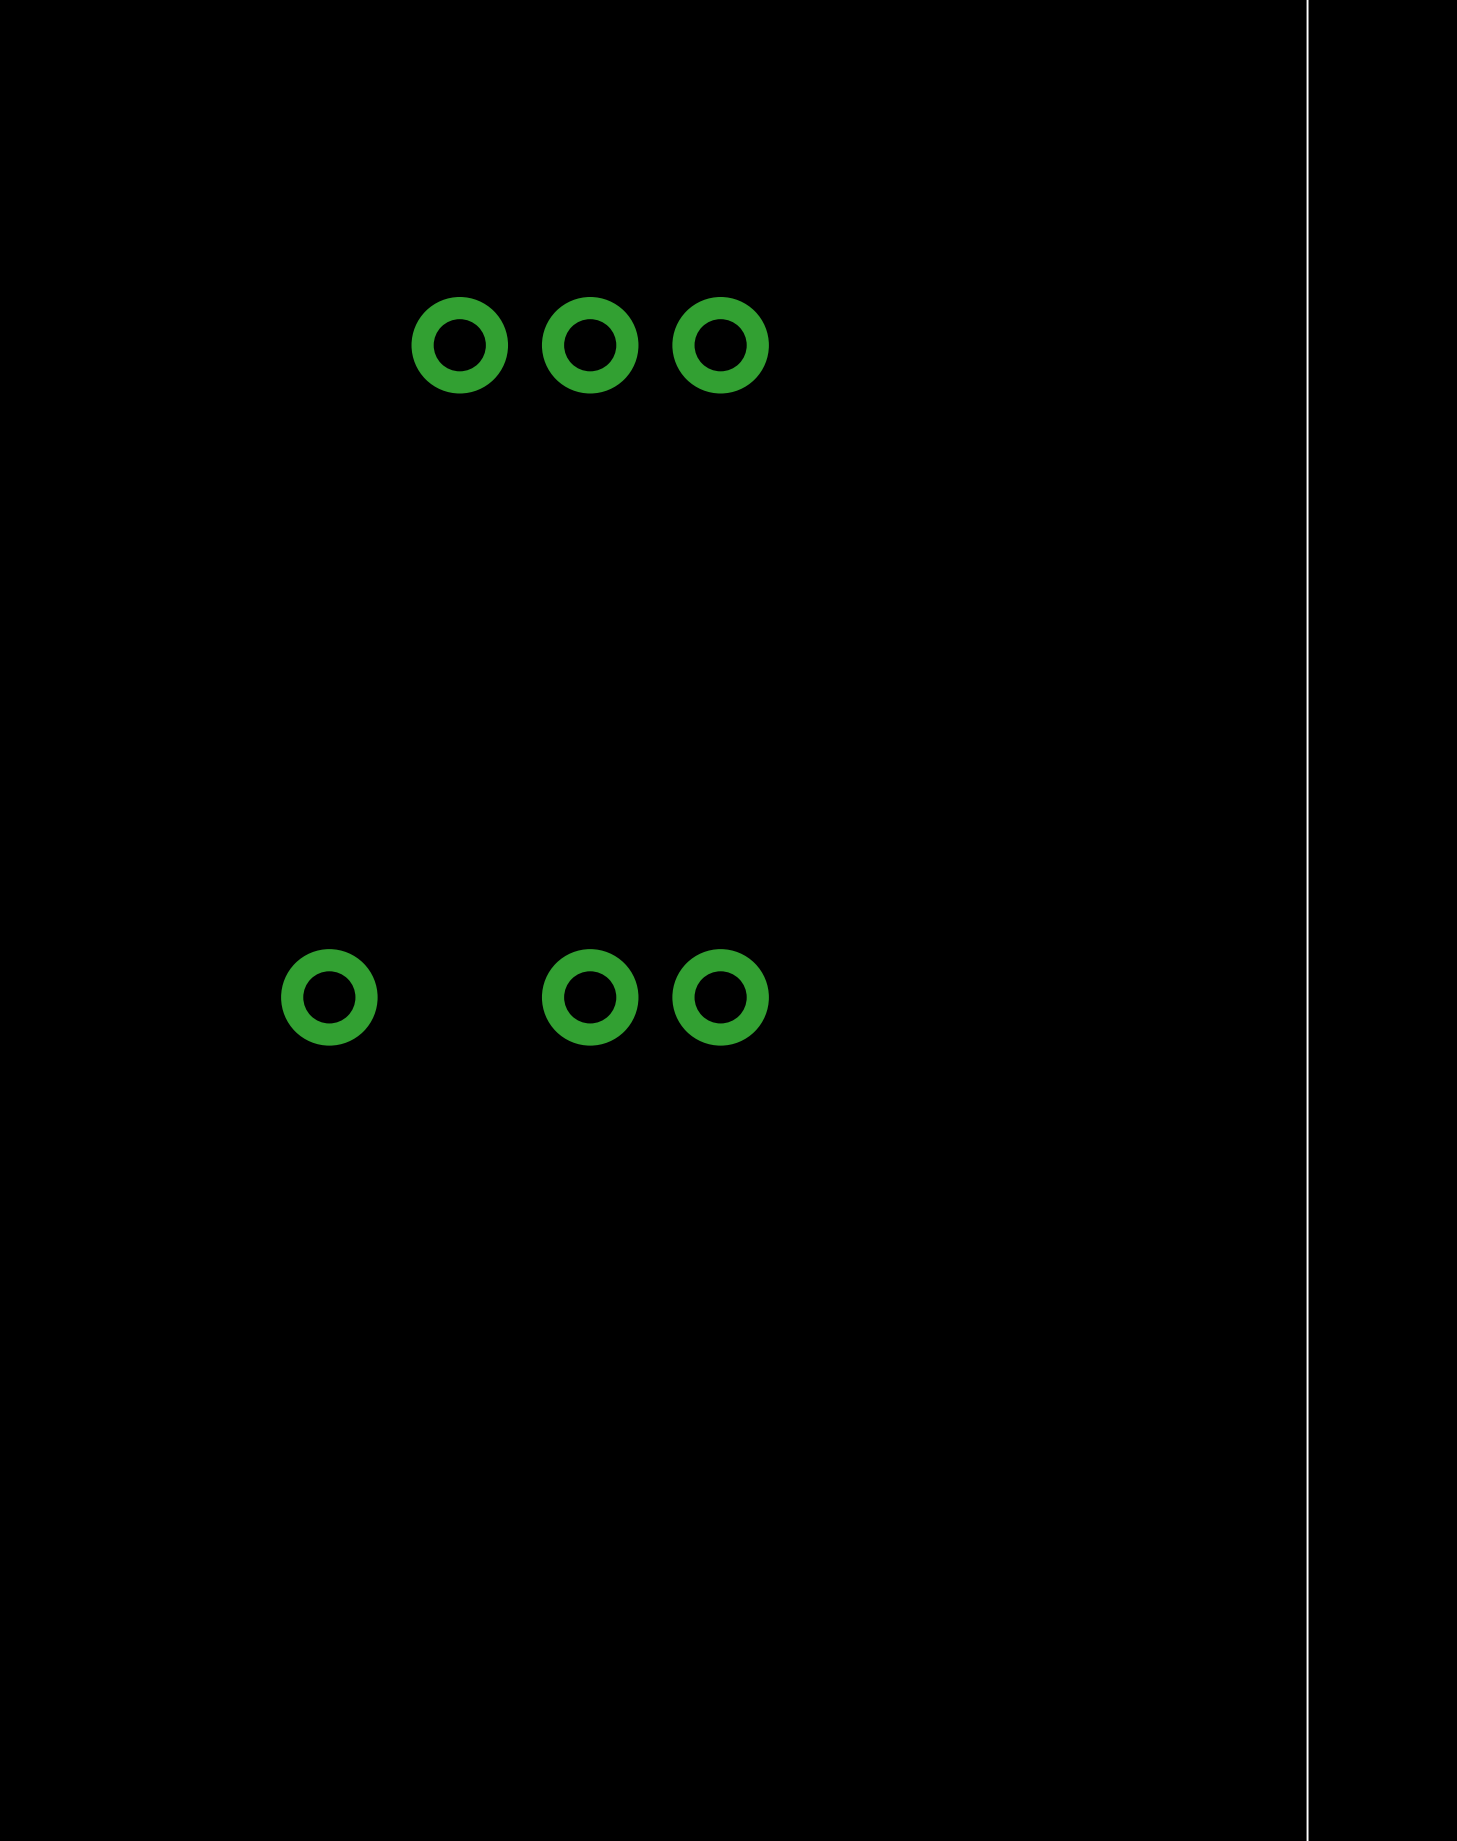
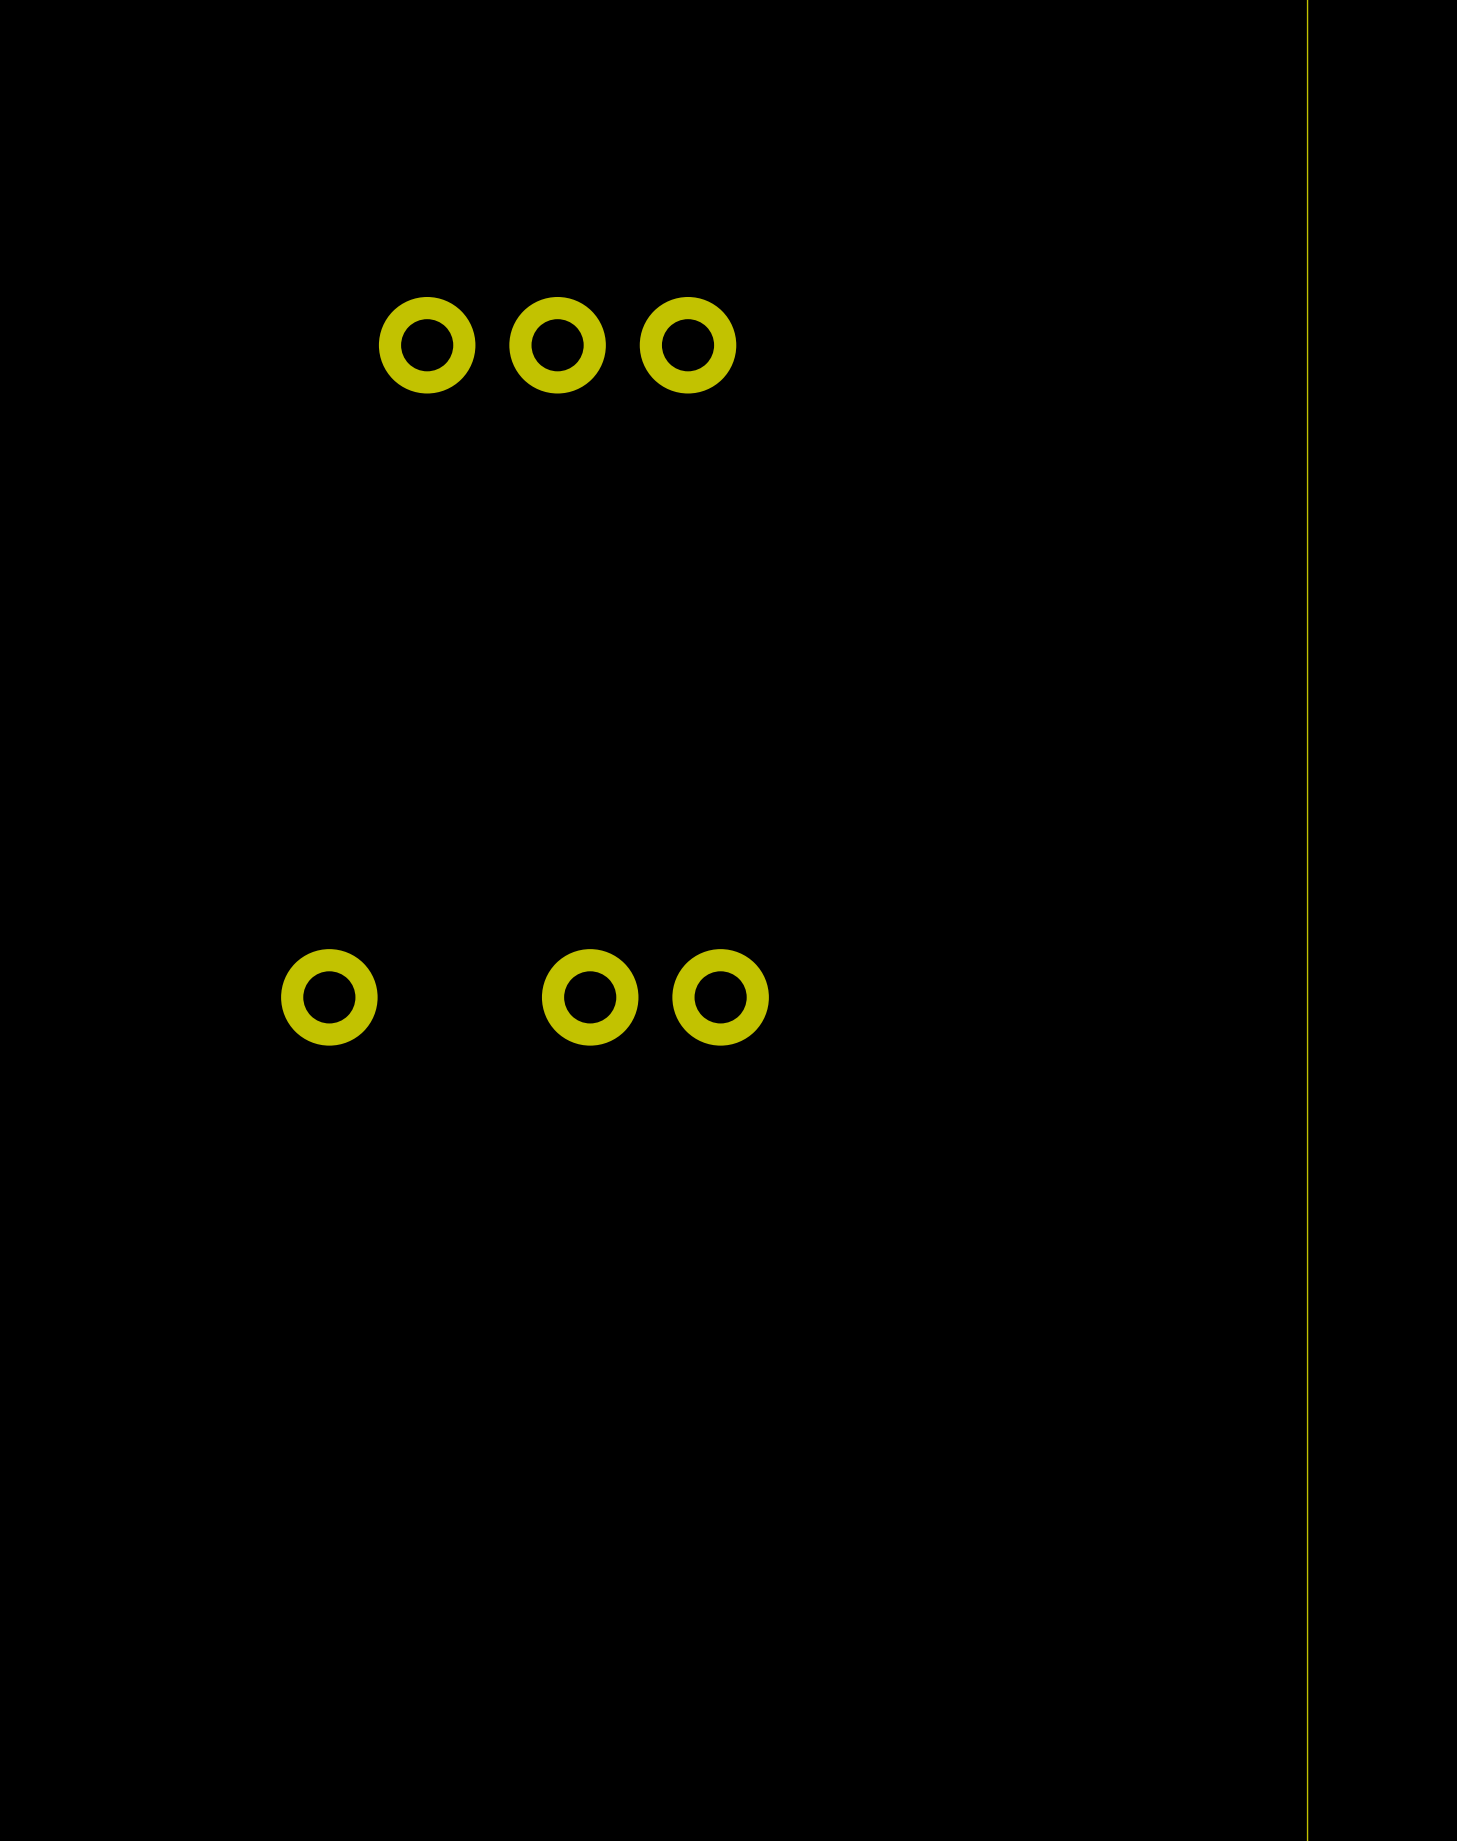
part position: (524, 345) -> (492, 345)
part position: (720, 345) -> (688, 345)

